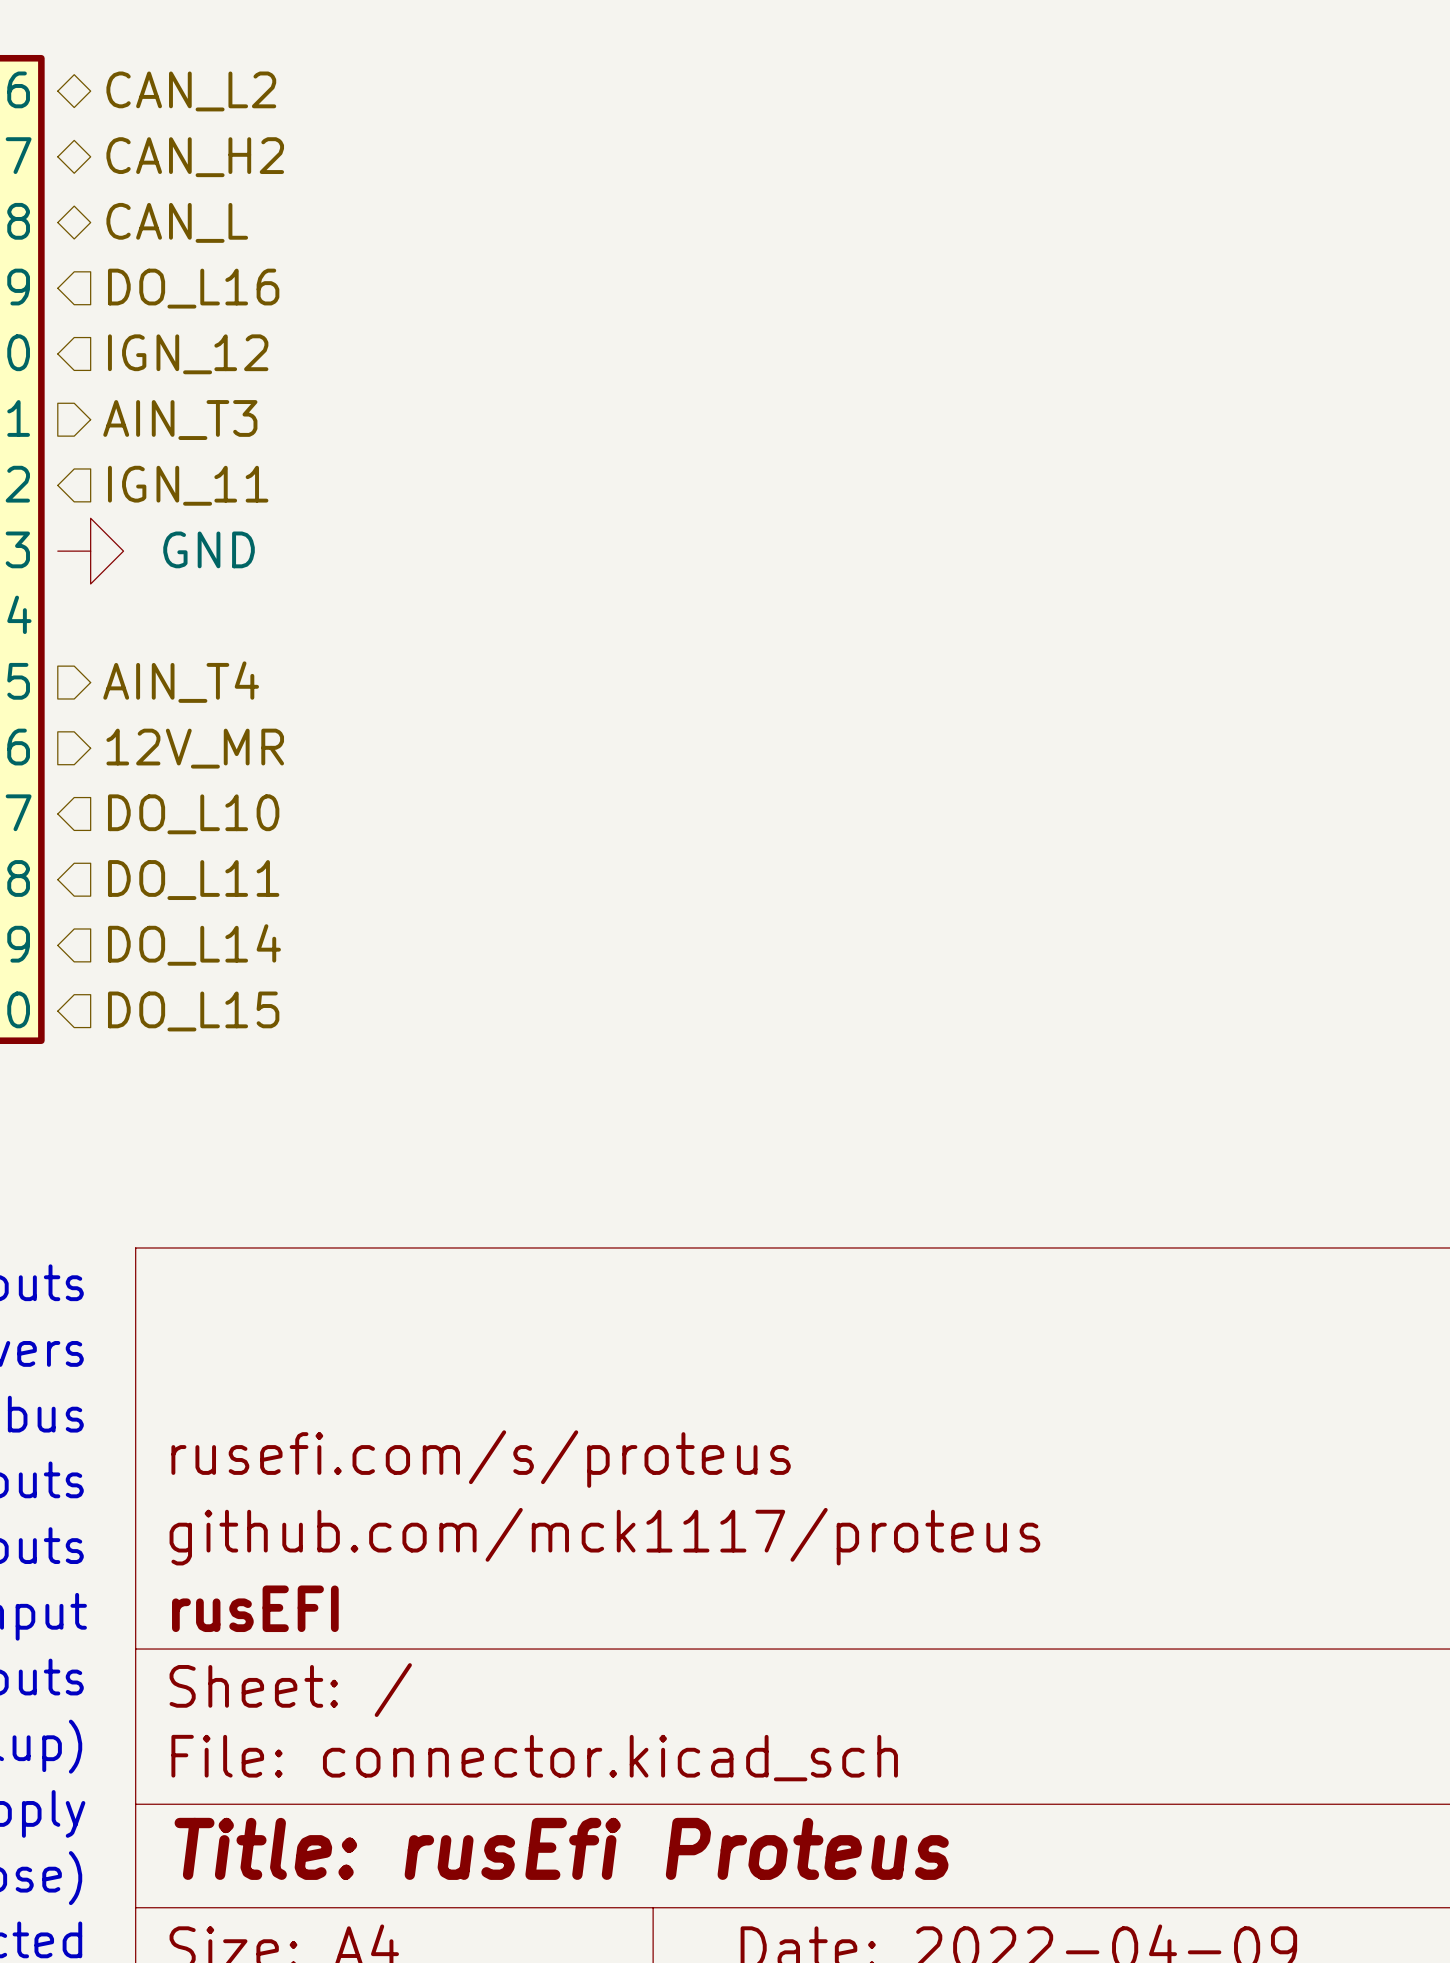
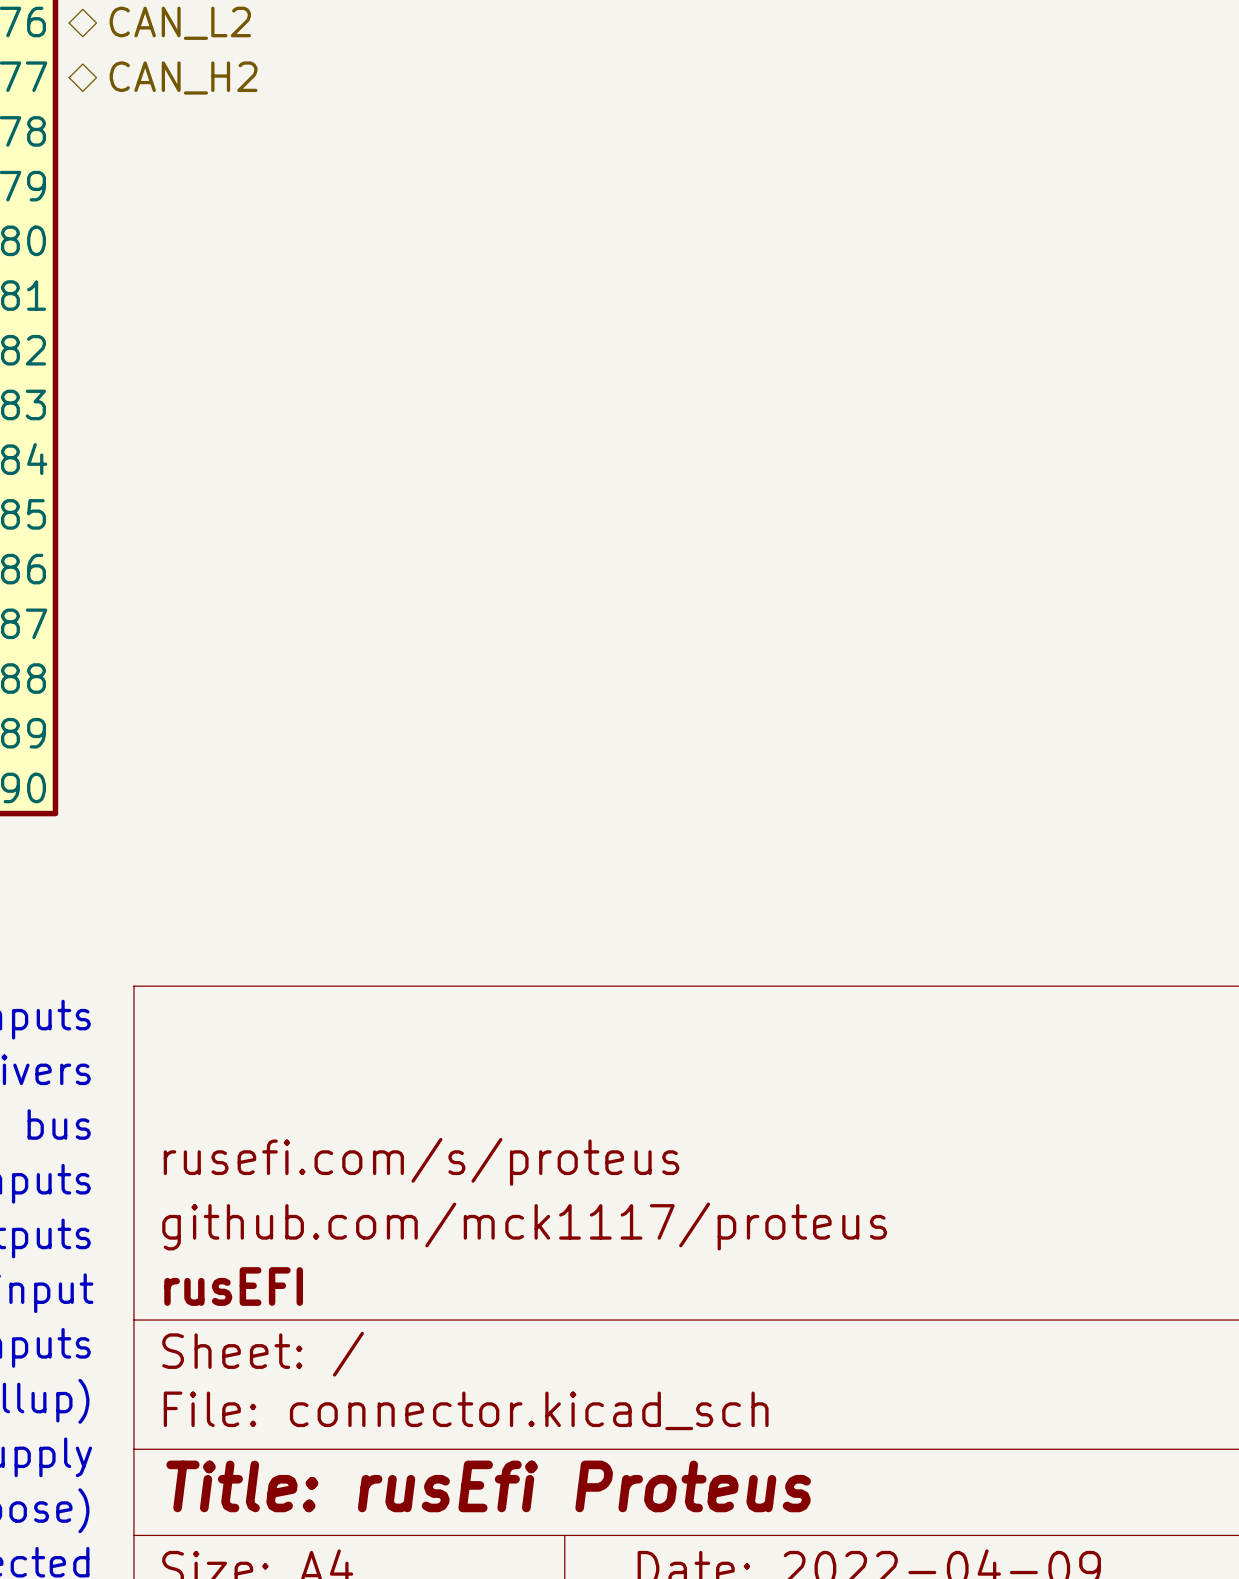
hierarchical label: CAN_L (177, 222) -> none
hierarchical label: DO_L16 (193, 288) -> none
hierarchical label: IGN_12 (188, 354) -> none
hierarchical label: AIN_T3 (180, 420) -> none
hierarchical label: IGN_11 (188, 485) -> none
power symbol: GND (90, 551) -> none
hierarchical label: AIN_T4 (181, 682) -> none
hierarchical label: 12V_MR (195, 748) -> none
hierarchical label: DO_L10 (193, 814) -> none
hierarchical label: DO_L11 (193, 880) -> none
hierarchical label: DO_L14 (194, 944) -> none
hierarchical label: DO_L15 (193, 1011) -> none

